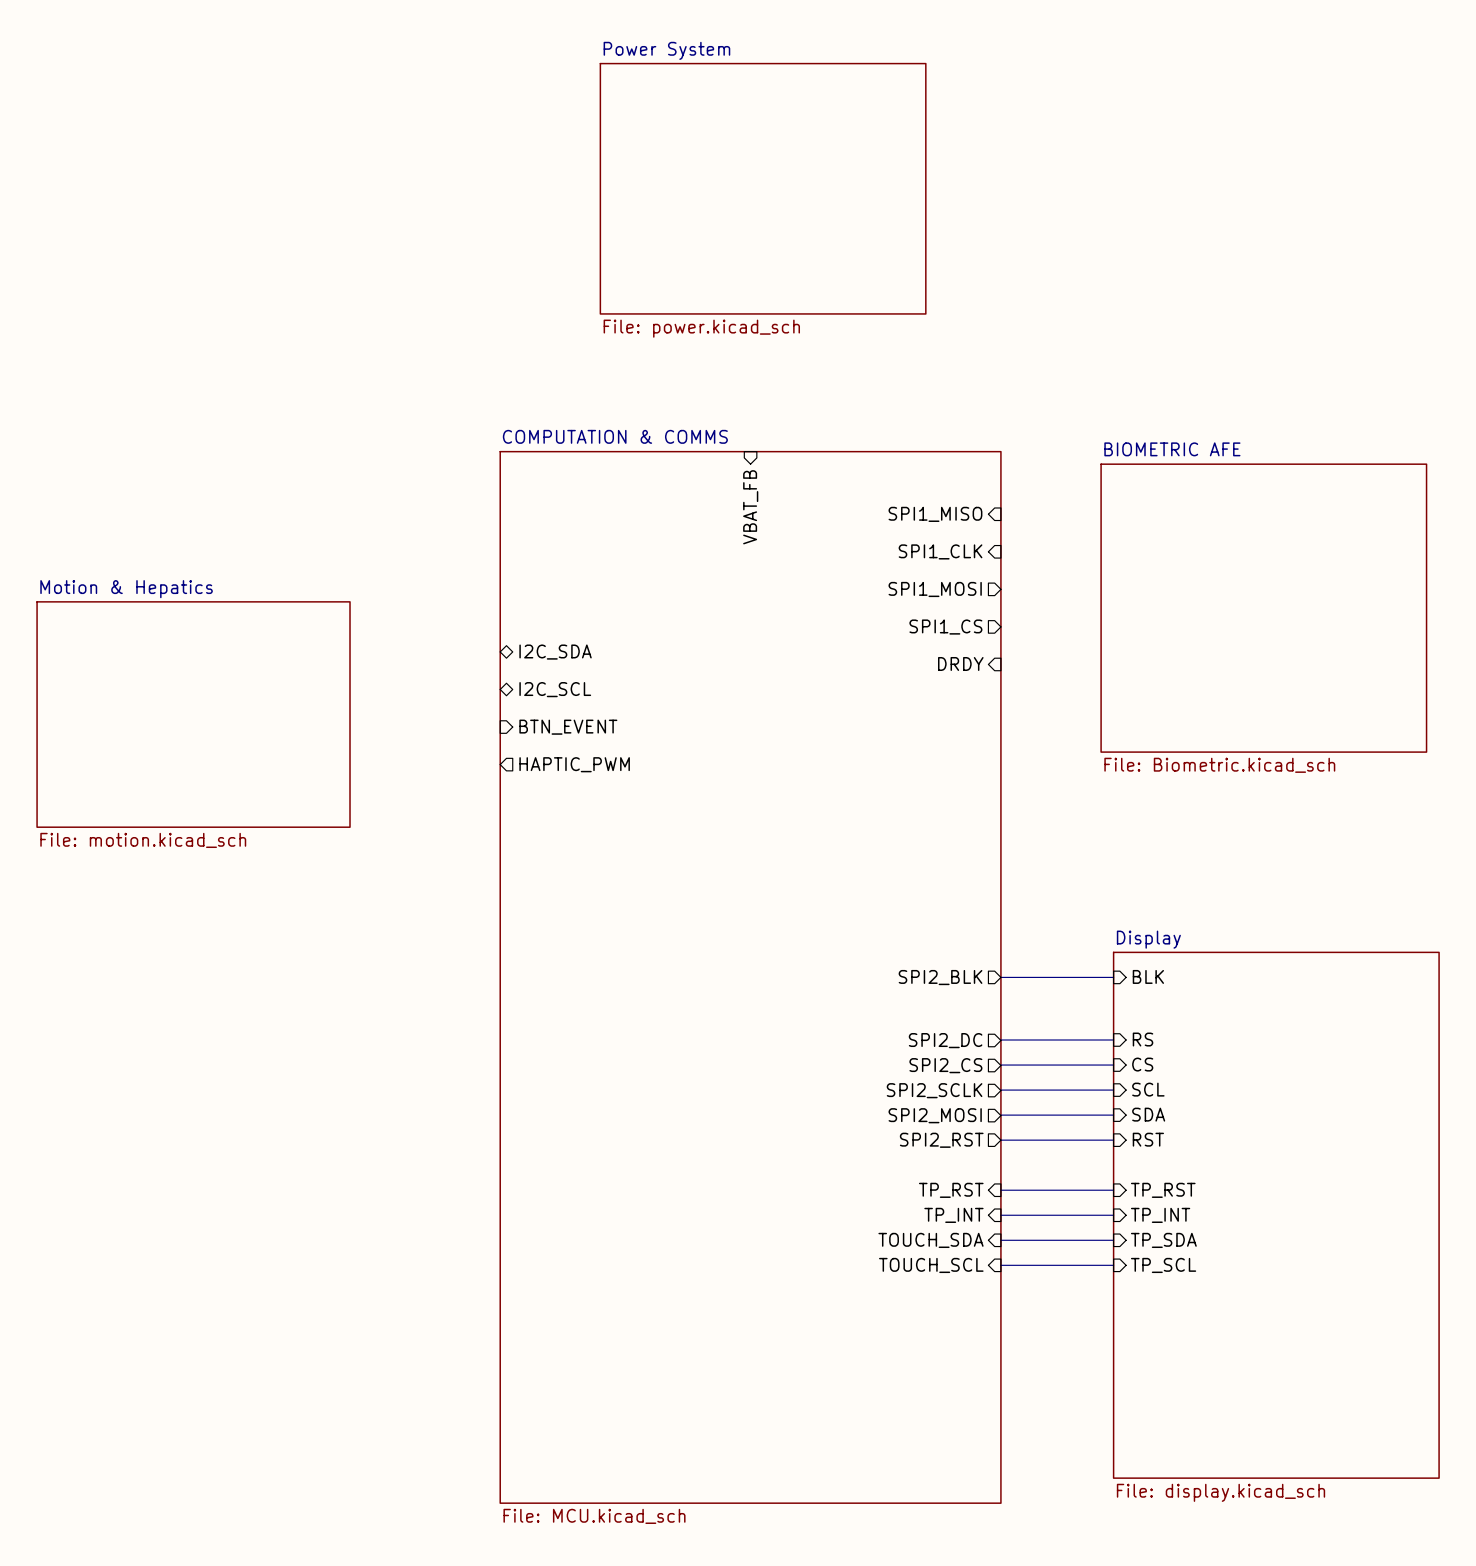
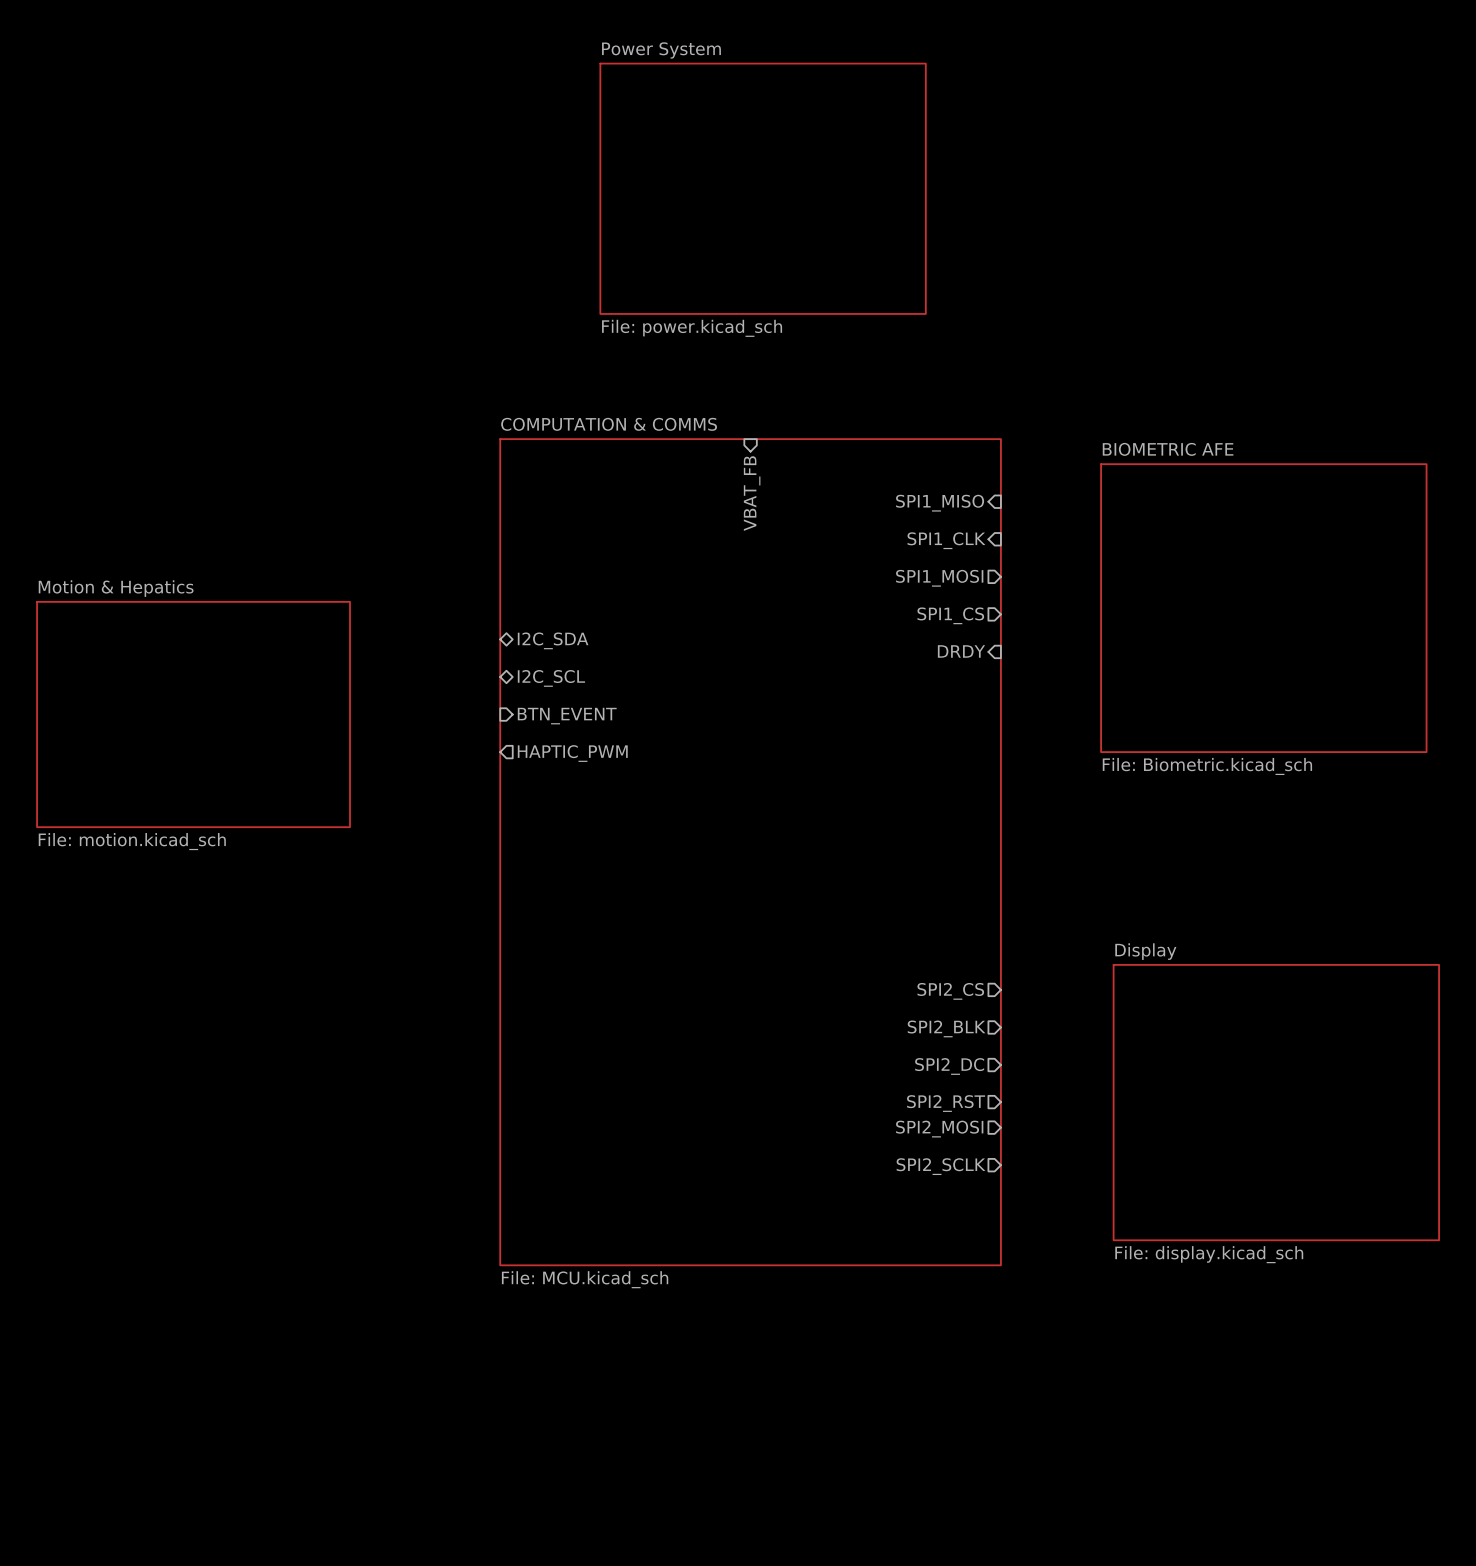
sheet pin position: VBAT_FB (750, 507) -> VBAT_FB (752, 493)
sheet pin position: SPI1_MISO (935, 514) -> SPI1_MISO (940, 503)
sheet pin position: SPI1_CLK (940, 551) -> SPI1_CLK (946, 540)
sheet pin position: SPI1_MOSI (935, 589) -> SPI1_MOSI (939, 578)
sheet pin position: SPI1_CS (945, 627) -> SPI1_CS (950, 615)
sheet pin position: I2C_SDA (555, 652) -> I2C_SDA (553, 640)
sheet pin position: DRDY (960, 663) -> DRDY (961, 651)
sheet pin position: I2C_SCL (555, 689) -> I2C_SCL (551, 678)
sheet pin position: BTN_EVENT (568, 727) -> BTN_EVENT (567, 716)
sheet pin position: HAPTIC_PWM (574, 764) -> HAPTIC_PWM (572, 753)
sheet COMPUTATION & COMMS: none -> File: MCU.kicad_sch (750, 852)
sheet pin: BLK (1148, 976) -> none
sheet COMPUTATION & COMMS: File: MCU.kicad_sch (750, 977) -> none
sheet pin position: SPI2_BLK (940, 977) -> SPI2_BLK (946, 1028)
wire: (1000, 977) (1113, 977) -> none
sheet pin: none -> SPI2_CS (950, 991)
sheet pin: RS (1143, 1039) -> none
sheet pin: SPI2_DC (945, 1040) -> none
wire: (1000, 1040) (1113, 1040) -> none
sheet pin: CS (1142, 1064) -> none
sheet pin: SPI2_CS (945, 1065) -> SPI2_DC (949, 1066)
wire: (1000, 1065) (1113, 1065) -> none
sheet pin: SCL (1148, 1089) -> none
sheet pin position: SPI2_SCLK (934, 1090) -> SPI2_SCLK (941, 1166)
wire: (1000, 1090) (1113, 1090) -> none
sheet Display: none -> File: display.kicad_sch (1276, 1102)
sheet pin: SDA (1148, 1114) -> none
sheet pin position: SPI2_MOSI (935, 1115) -> SPI2_MOSI (939, 1129)
wire: (1000, 1115) (1113, 1115) -> none
sheet pin: RST (1148, 1139) -> none
sheet pin position: SPI2_RST (941, 1140) -> SPI2_RST (946, 1103)
wire: (1000, 1140) (1113, 1140) -> none
sheet pin: TP_RST (951, 1190) -> none
wire: (1000, 1190) (1113, 1190) -> none
sheet pin: TP_RST (1163, 1190) -> none
sheet pin: TP_INT (953, 1215) -> none
wire: (1000, 1215) (1113, 1215) -> none
sheet pin: TP_INT (1160, 1215) -> none
sheet Display: File: display.kicad_sch (1276, 1215) -> none
sheet pin: TOUCH_SDA (931, 1240) -> none
wire: (1000, 1240) (1113, 1240) -> none
sheet pin: TP_SDA (1163, 1240) -> none
sheet pin: TOUCH_SCL (931, 1265) -> none
wire: (1000, 1265) (1113, 1265) -> none
sheet pin: TP_SCL (1163, 1265) -> none

